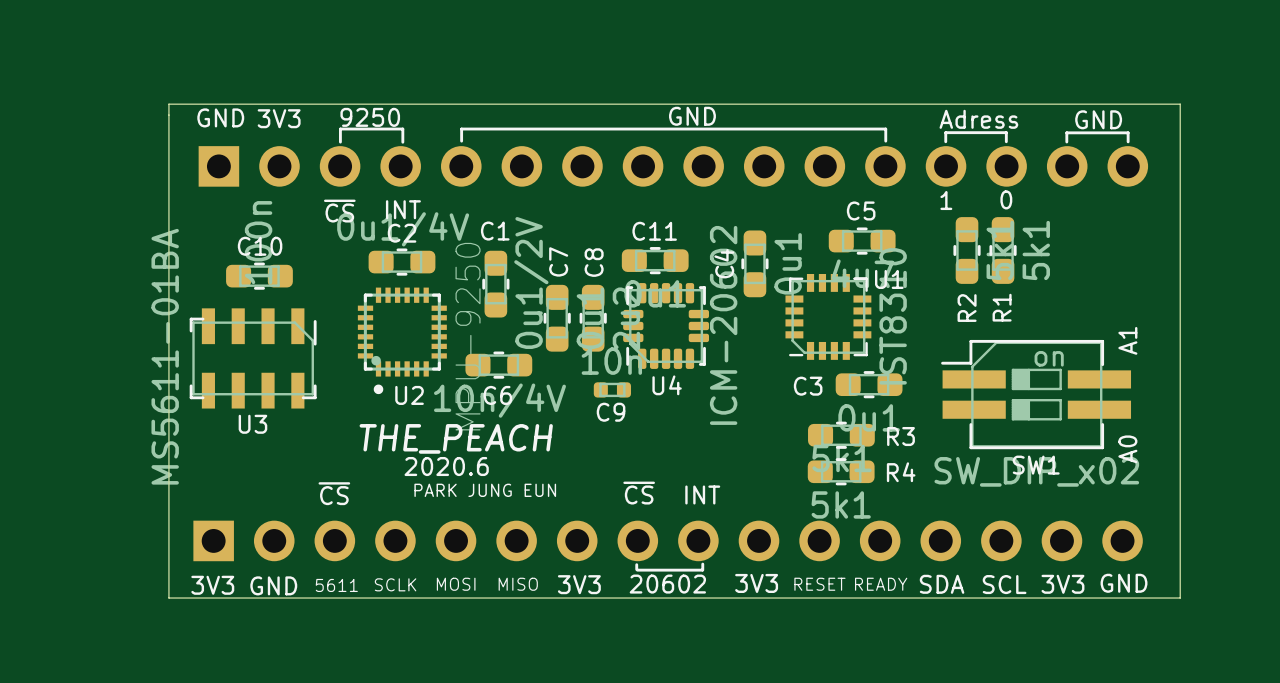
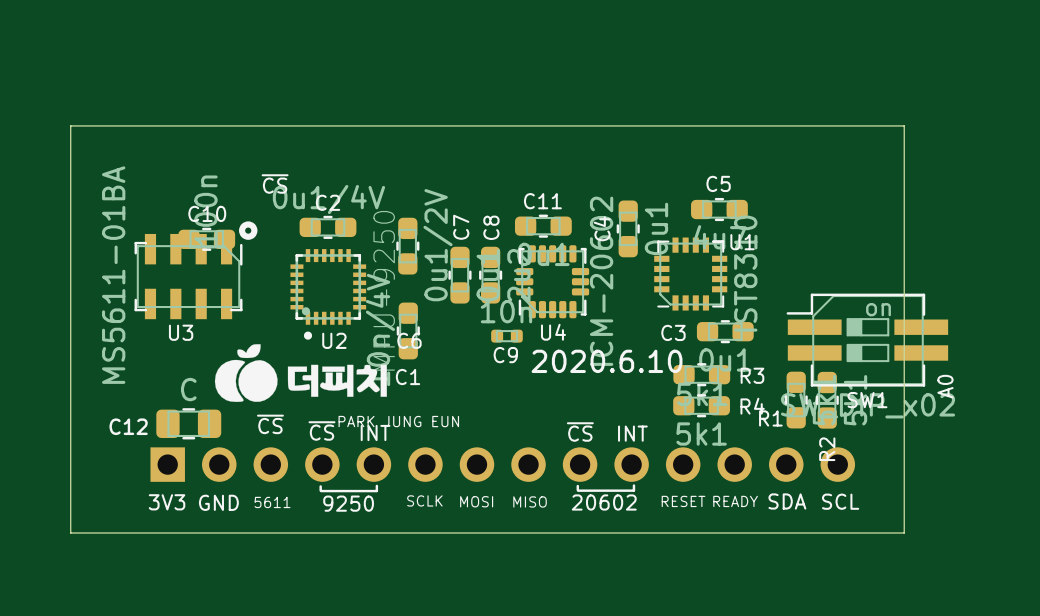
board edge: (168, 104) (168, 598) (1180, 598) (1180, 104) (168, 104) -> (70, 125) (70, 533) (904, 533) (904, 125) (70, 125)
text: GND (692, 116) -> none
text: GND (220, 117) -> none
text position: 9250 (370, 117) -> 9250 (348, 503)
text: 3V3 (279, 118) -> none
text: Adress (978, 119) -> none
text: GND (1098, 119) -> none
line: (461, 141) (461, 129) (885, 129) (885, 141) -> none
line: (945, 141) (945, 132) (1006, 132) (1006, 141) -> none
line: (1128, 141) (1128, 132) (1066, 132) (1066, 141) -> none
line: (340, 142) (340, 129) (402, 129) (402, 142) -> none
part: (673, 166) -> none
text: 0 (1006, 199) -> none
text: 1 (946, 200) -> none
text: INT (403, 209) -> none
C1 name position: C1 (495, 231) -> C1 (408, 377)
R2 position: (967, 250) -> (827, 400)
R1 position: (1003, 250) -> (796, 400)
drawing: none -> [239, 221, 258, 240]
R1 name rotation: 0° (1002, 307) -> 90° clockwise (770, 418)
R1 name position: R1 (1002, 307) -> R1 (770, 418)
text: A1 (1127, 340) -> none
U3 position: (253, 358) -> (188, 276)
C1 rotation: 0° (498, 365) -> 90° clockwise (408, 330)
drawing: none -> [214, 344, 387, 402]
text: none -> 2020.6.10 (607, 361)
U3 name position: U3 (252, 424) -> U3 (181, 332)
text: THE_PEACH (456, 438) -> none
text: 2020.6 (446, 466) -> none
C12: none -> C (188, 423)
text position: ~{CS} (639, 493) -> ~{CS} (580, 431)
text position: INT (702, 494) -> INT (632, 433)
text: none -> ~{CS} (321, 430)
text: none -> INT (375, 433)
part: none -> (502, 464)
part: (668, 540) -> none
line: (636, 564) (636, 569) -> (577, 486) (577, 490)
line: (702, 564) (702, 570) -> (633, 485) (633, 490)
line: none -> (376, 485) (376, 491)
line: none -> (320, 486) (320, 490)
line: (637, 570) (702, 570) -> (578, 490) (633, 490)
line: none -> (321, 491) (376, 491)
text: 3V3 (756, 583) -> none
text: GND (1124, 583) -> none
text: SCLK (395, 584) -> none
text position: MOSI (456, 584) -> MOSI (476, 501)
text: MISO (518, 584) -> SCLK (424, 500)
text: 3V3 (579, 584) -> none
text: none -> MISO (530, 501)
text position: 20602 (667, 584) -> 20602 (604, 502)
text: 3V3 (1062, 584) -> none

